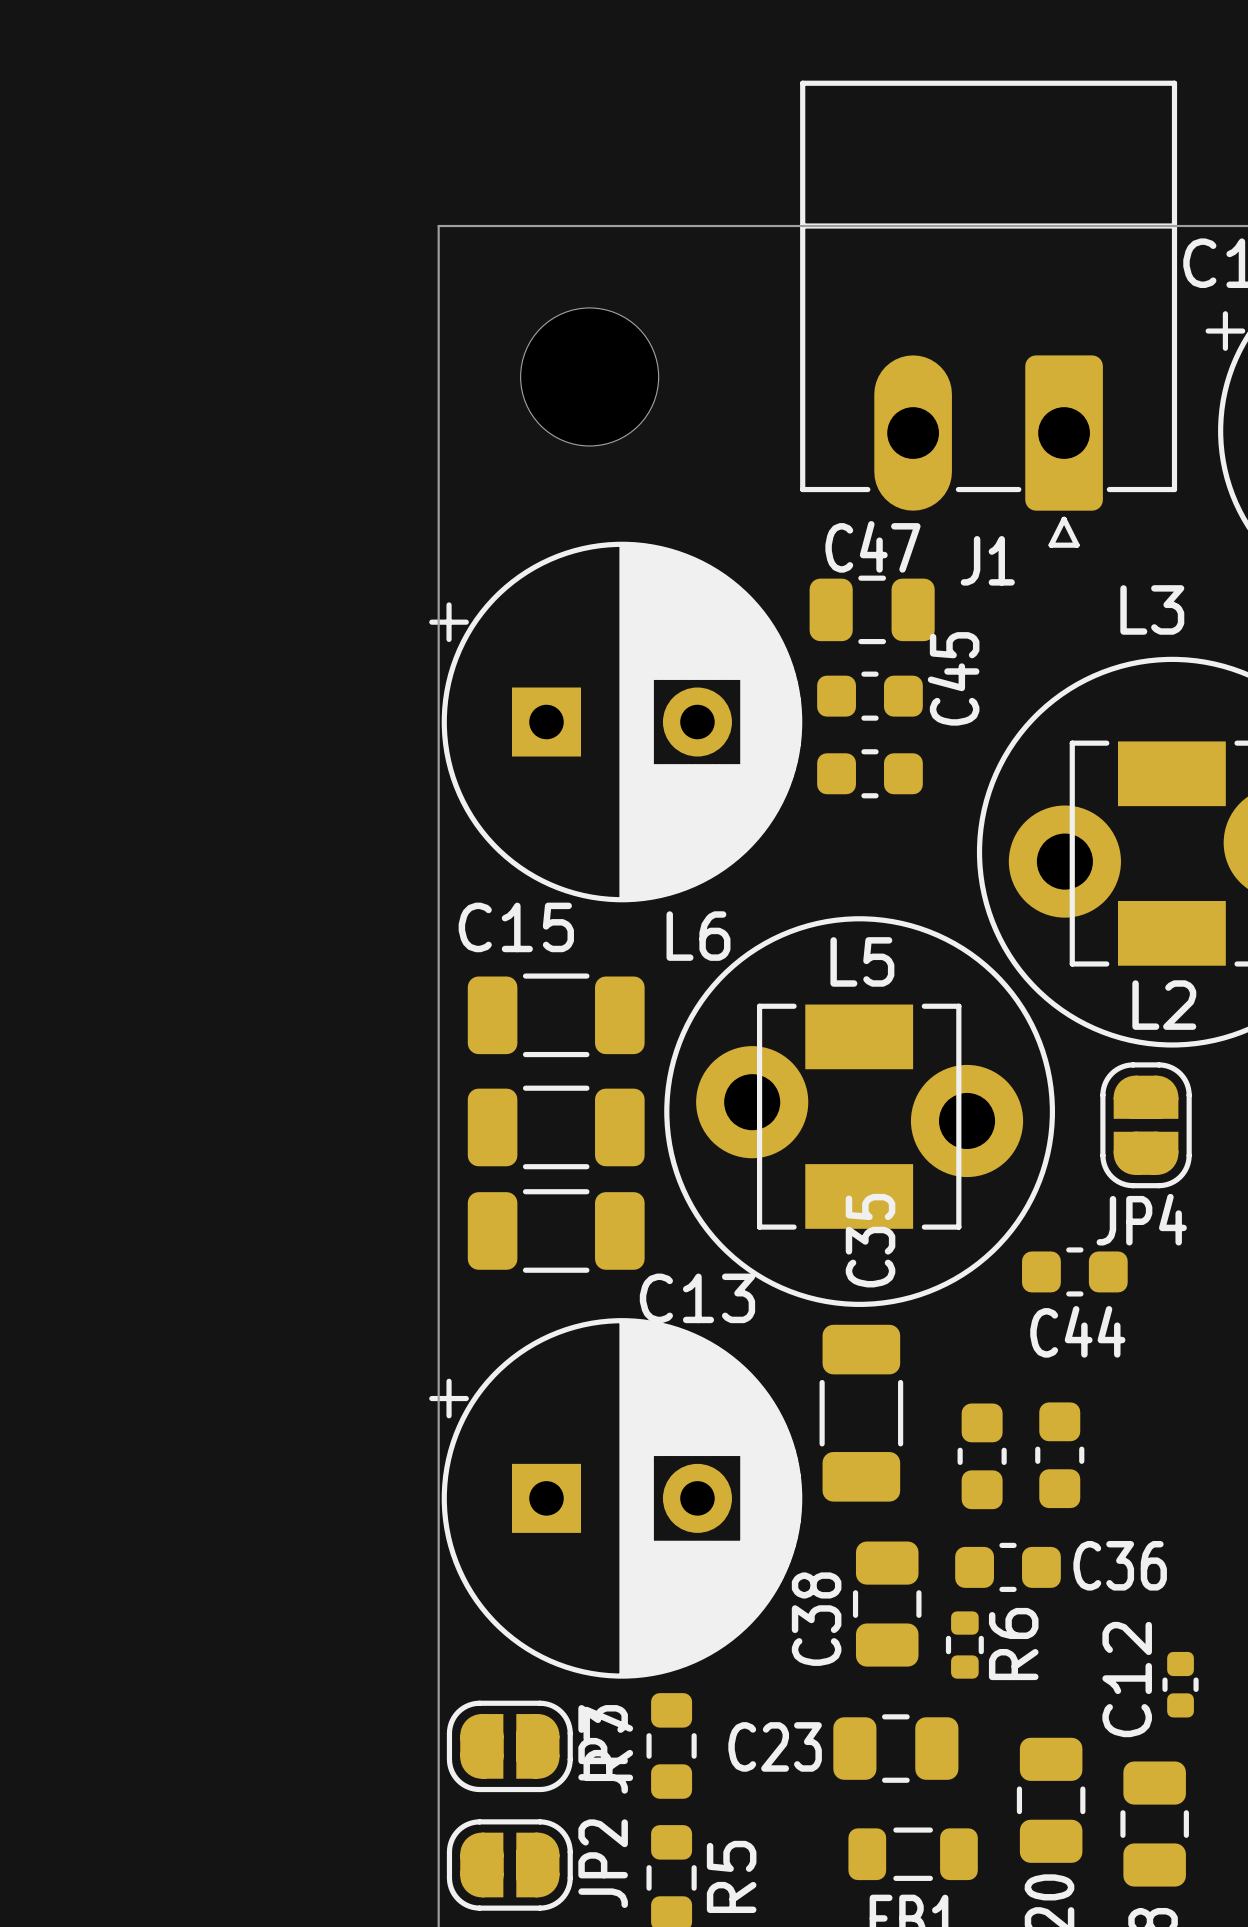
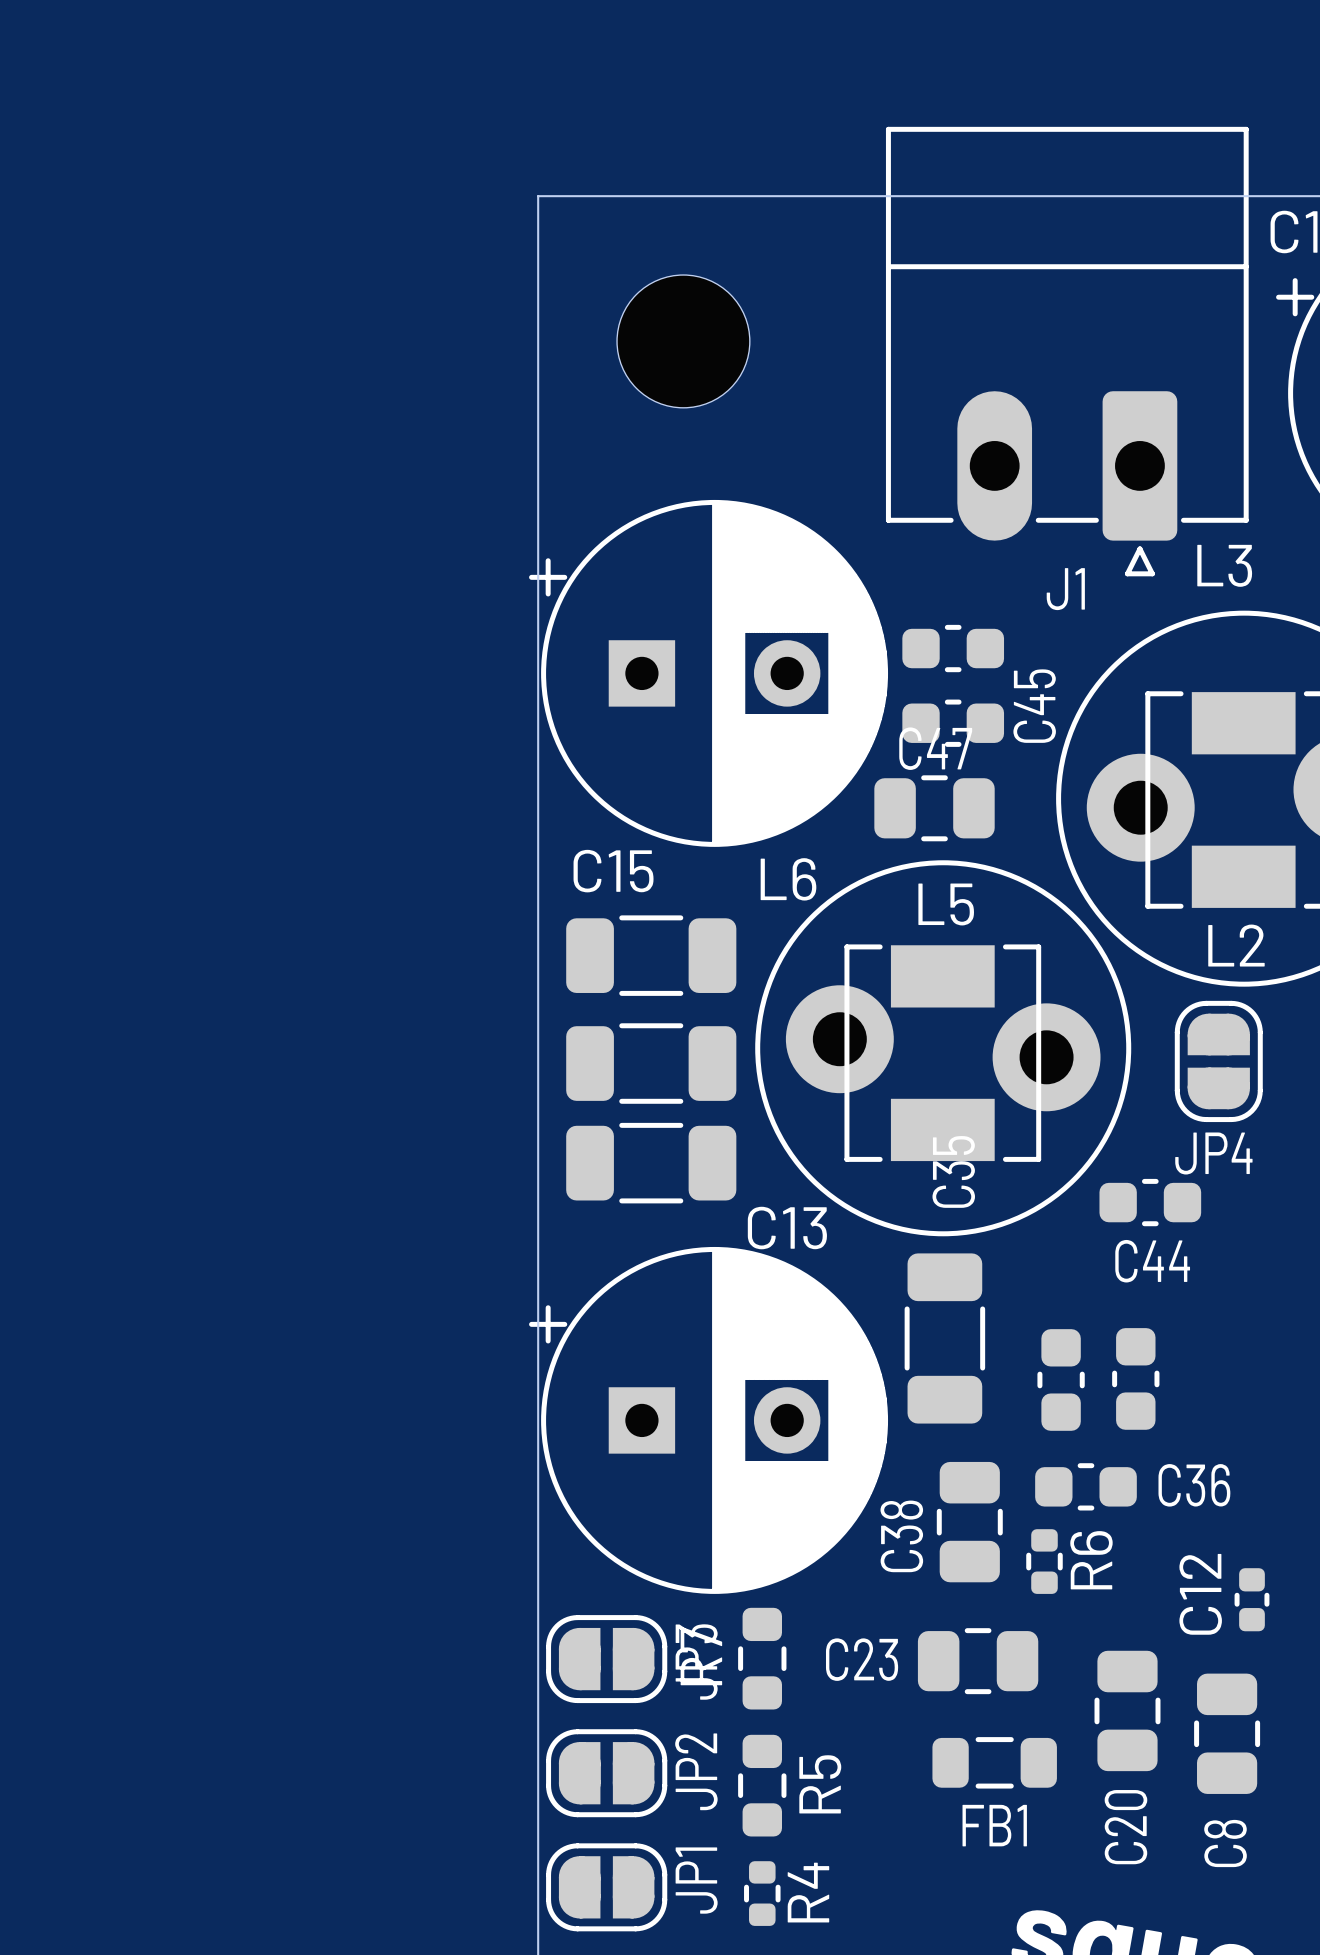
J1 position: (988, 314) -> (1067, 351)
C47 position: (872, 609) -> (934, 808)
C45 name: C45 (953, 678) -> none
C45 name: none -> C45 (1034, 706)

